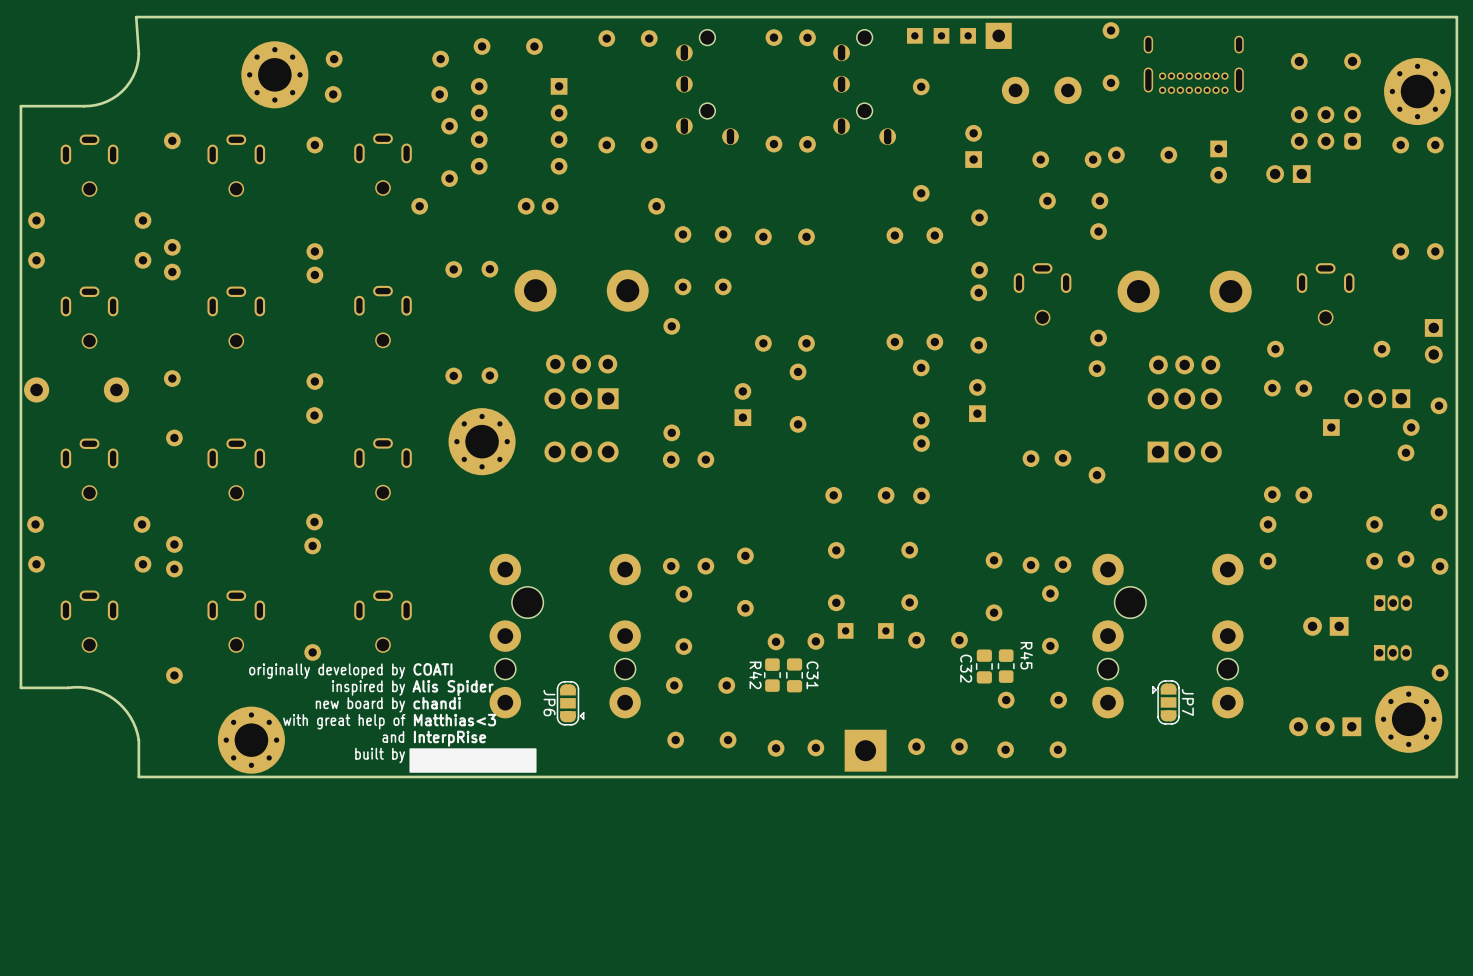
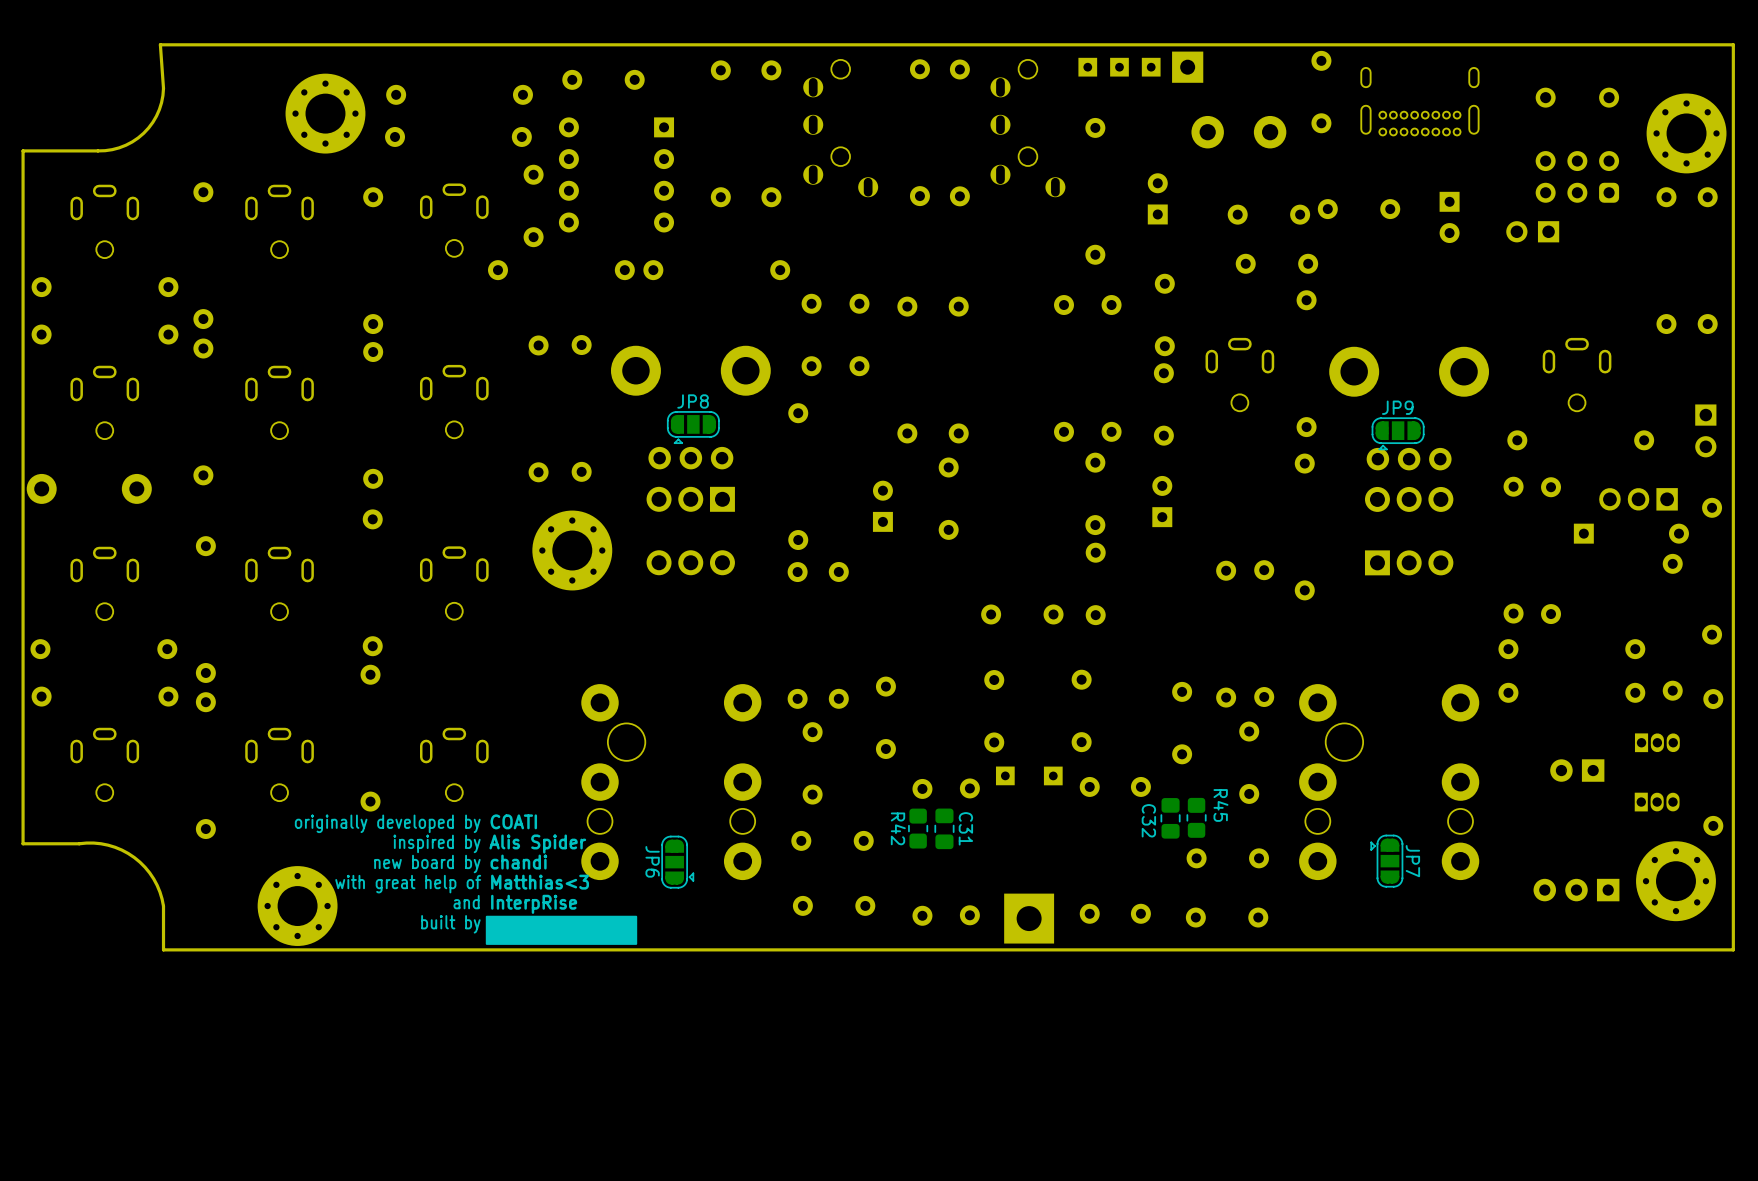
JP8: none -> (693, 427)
JP9: none -> (1398, 433)

